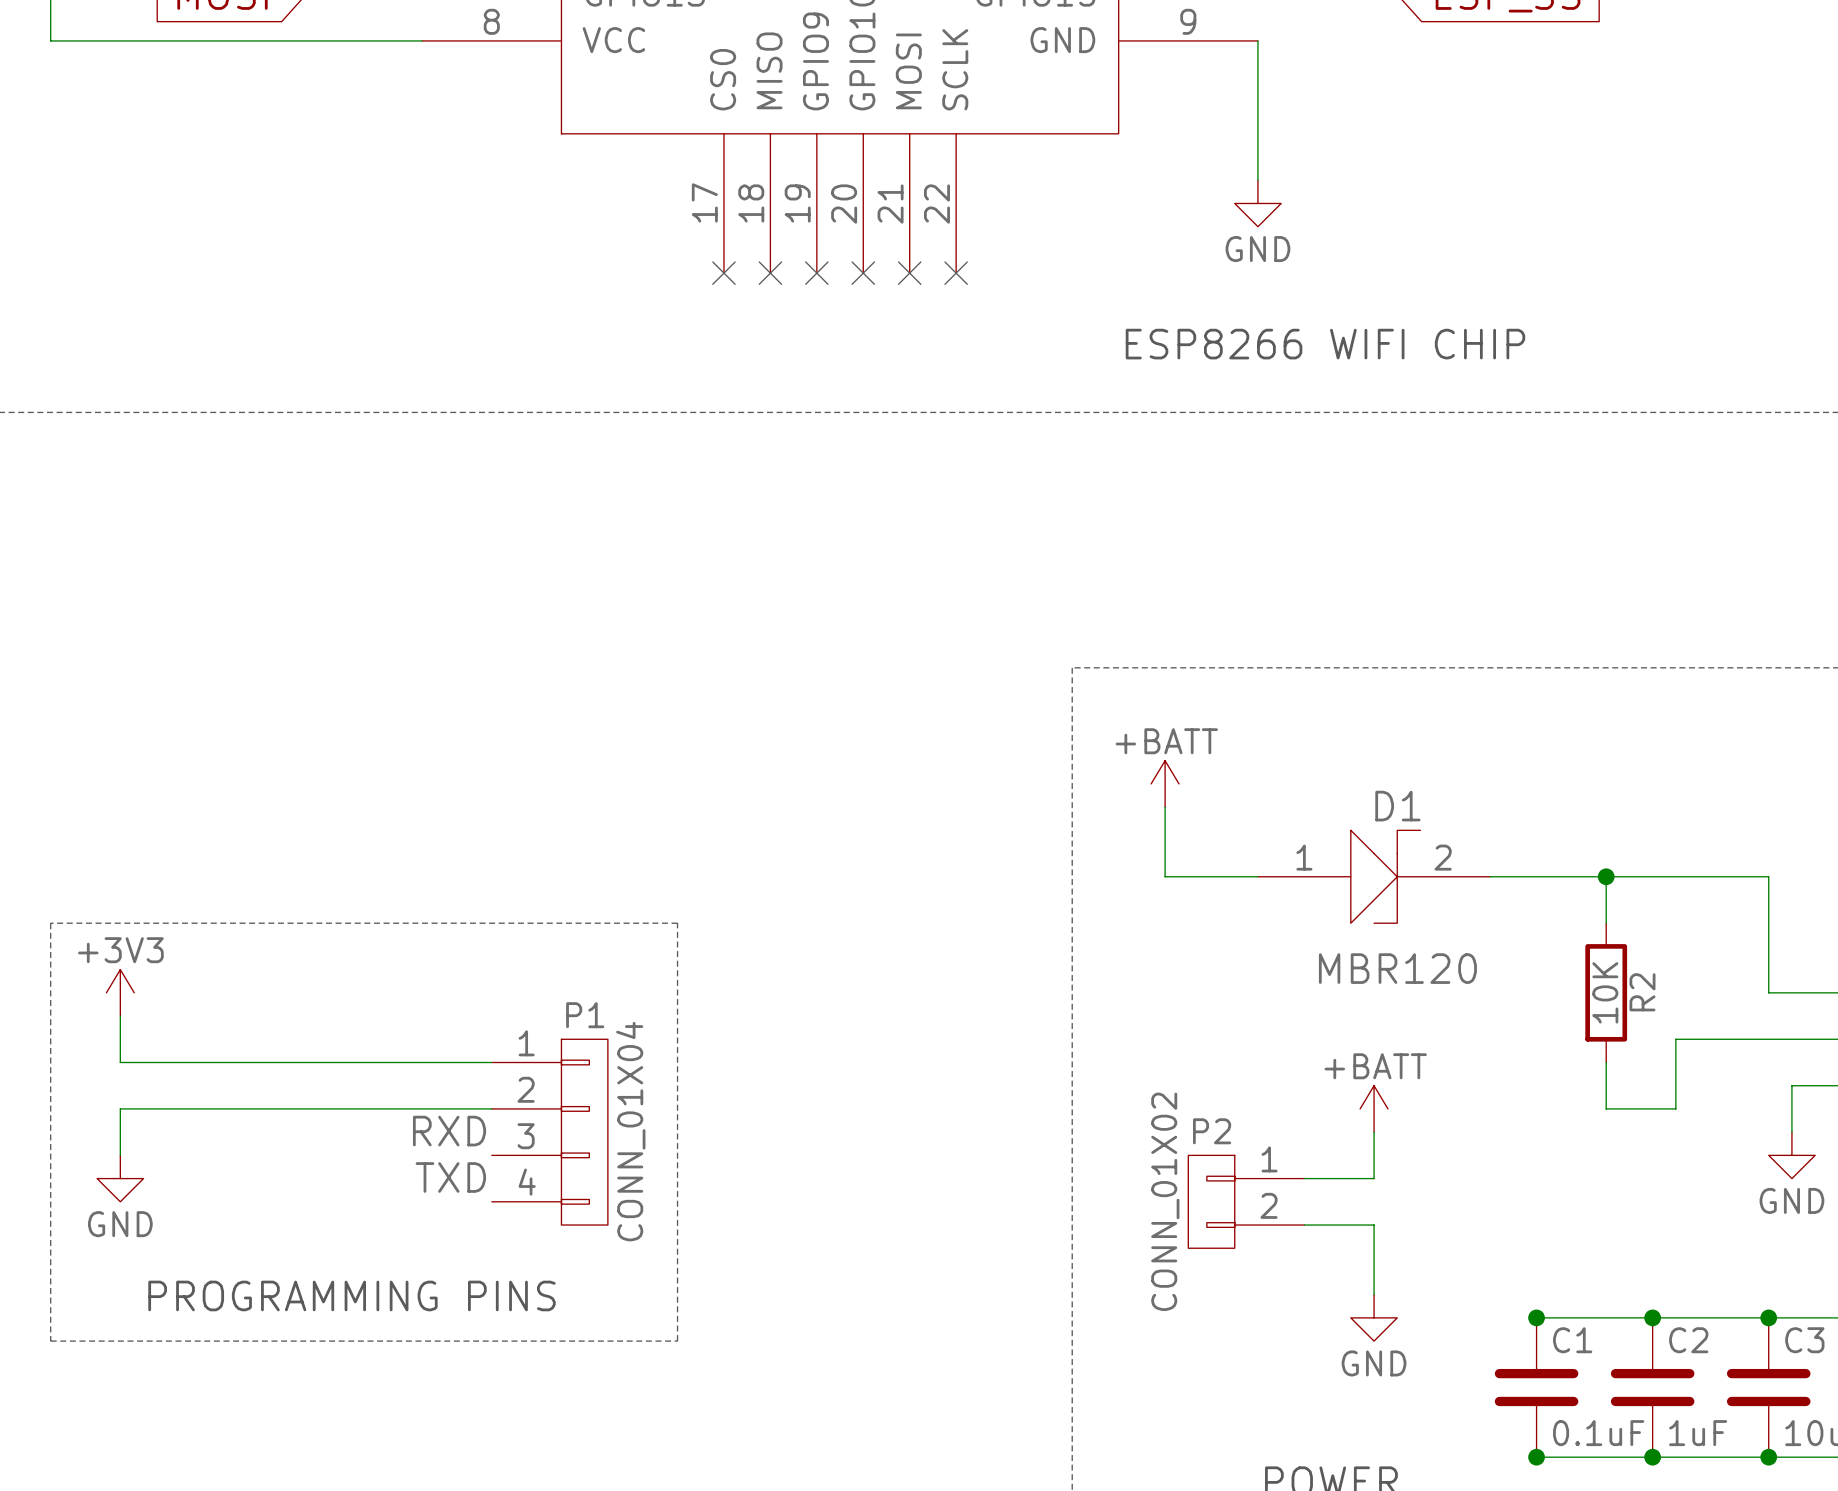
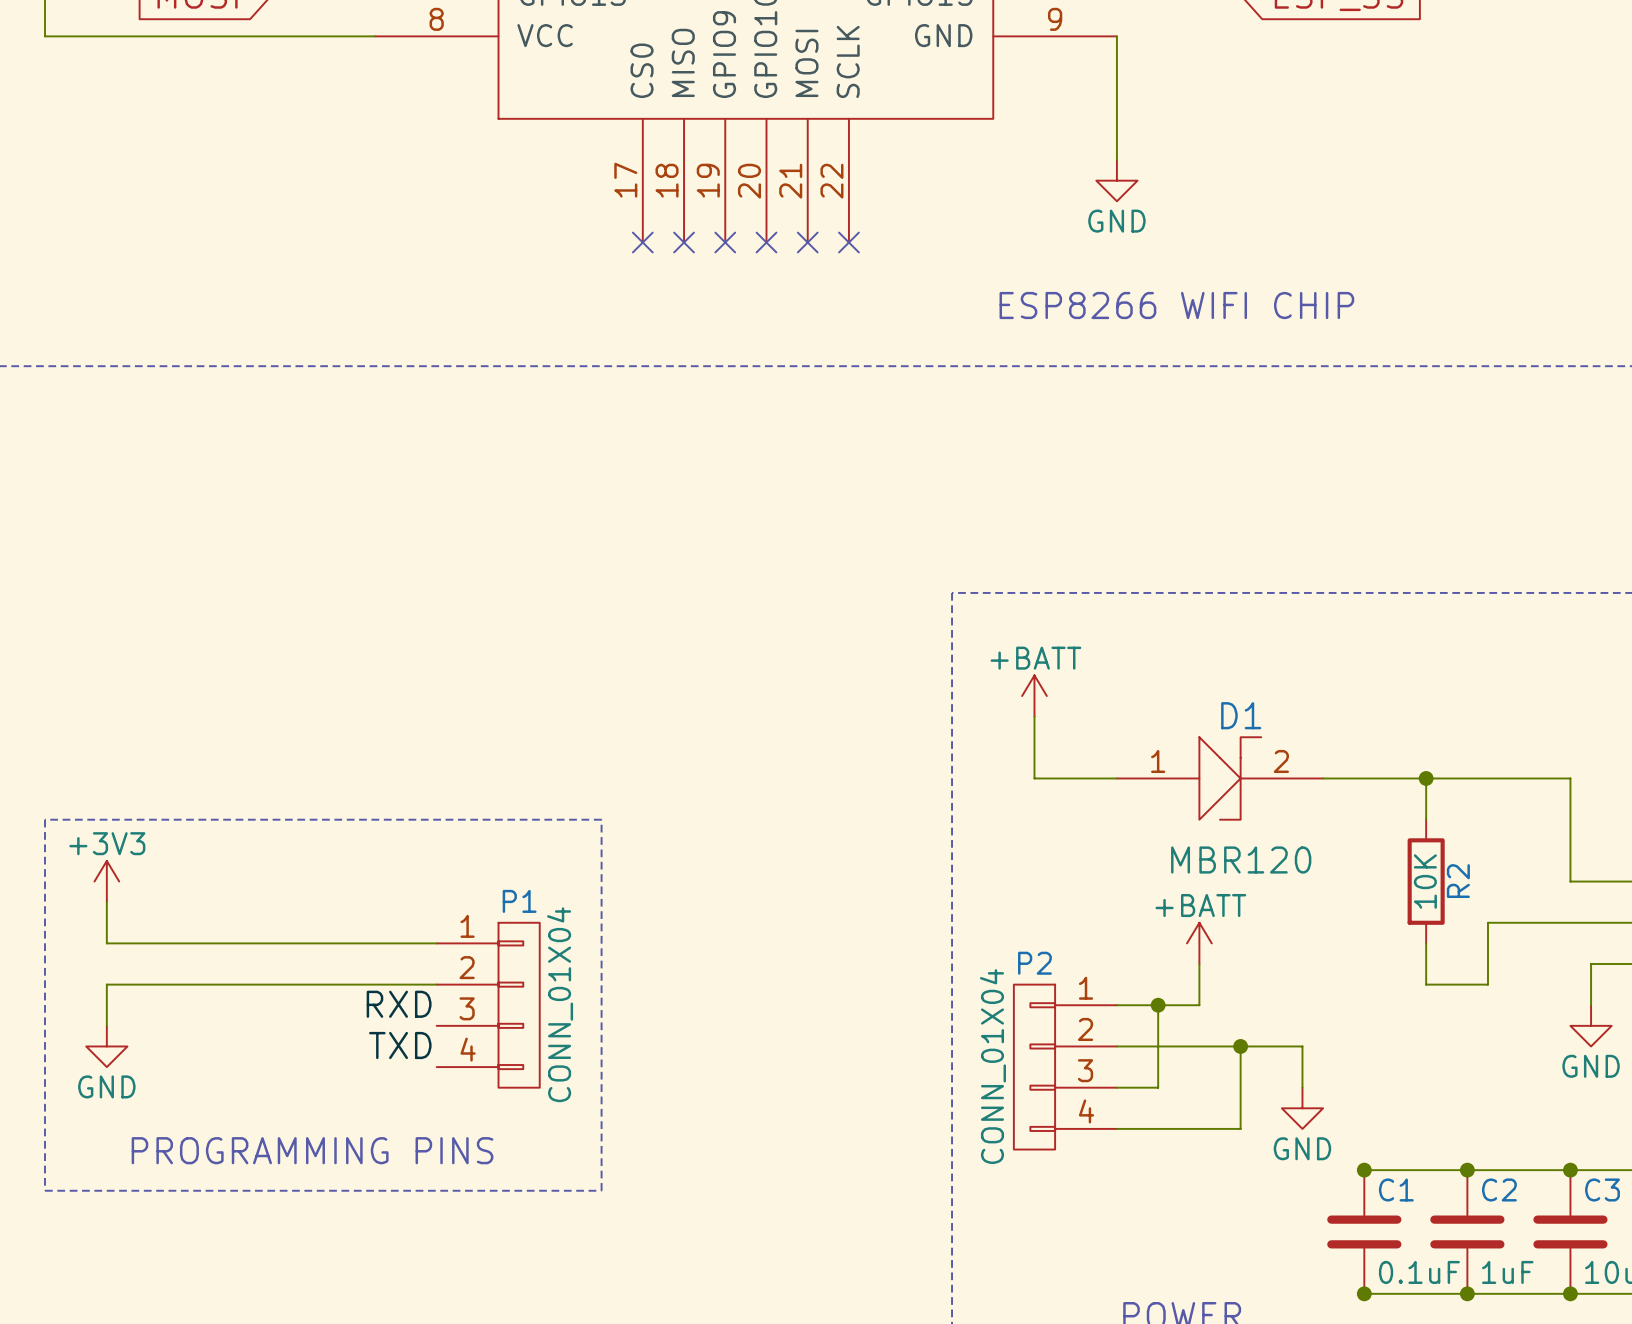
wire: none -> (1199, 964) (1199, 1005) (1116, 1005)
power symbol position: +BATT (1374, 1108) -> +BATT (1199, 943)
P2 name position: P2 (1212, 1131) -> P2 (1034, 963)
wire: none -> (1158, 1005) (1158, 1087) (1116, 1087)
junction: none -> (1158, 1005)
wire: (1374, 1132) (1374, 1178) -> (1302, 1087) (1302, 1046) (1220, 1046)
P2 symbol: [1188, 1155, 1305, 1249] -> [1013, 984, 1117, 1150]
wire: none -> (1240, 1046) (1240, 1128) (1116, 1128)
junction: none -> (1240, 1046)
P2 value: CONN_01X02 (1165, 1201) -> CONN_01X04 (992, 1066)
wire: (1304, 1225) (1374, 1225) (1374, 1294) -> none
power symbol position: GND (1374, 1317) -> GND (1302, 1108)

